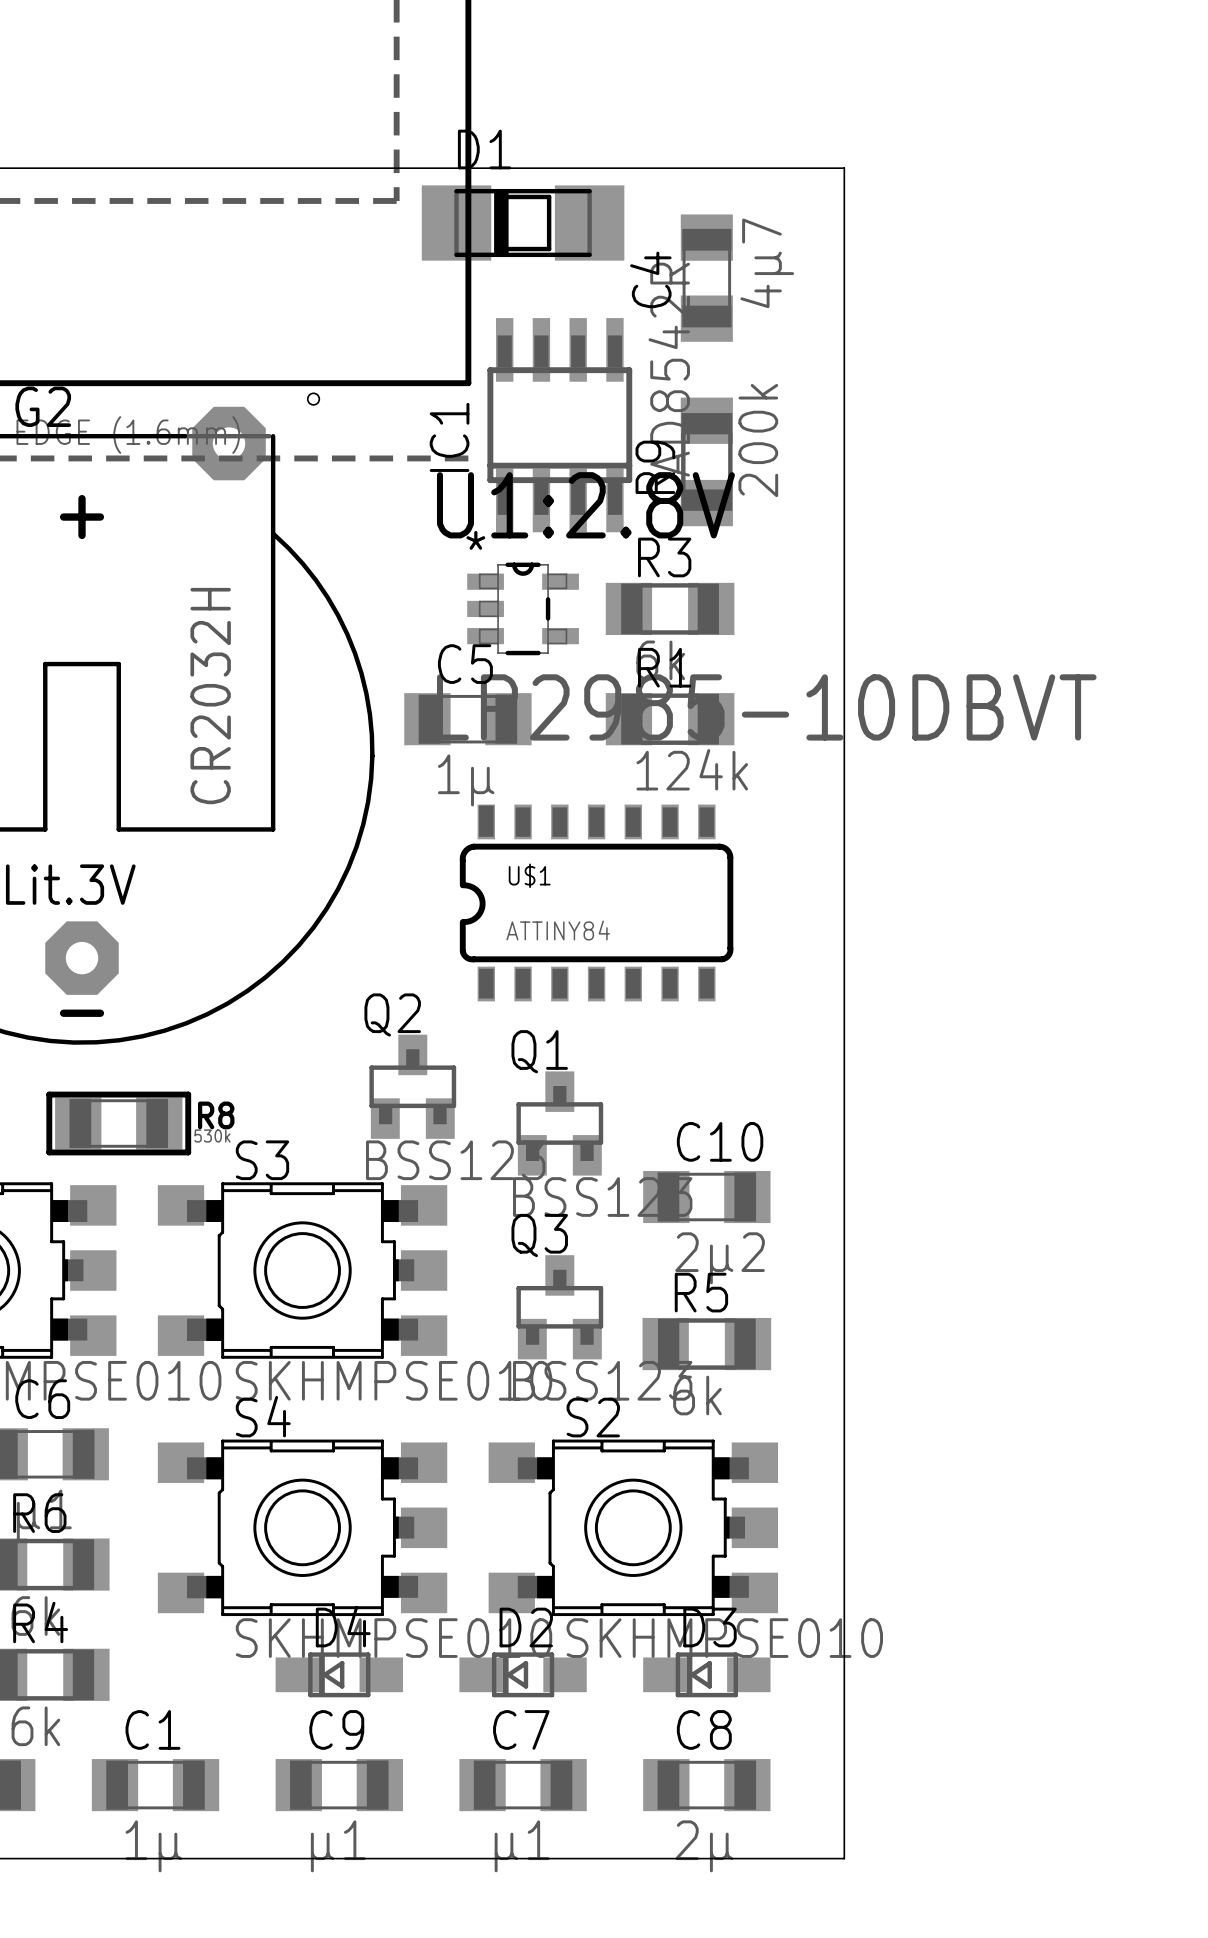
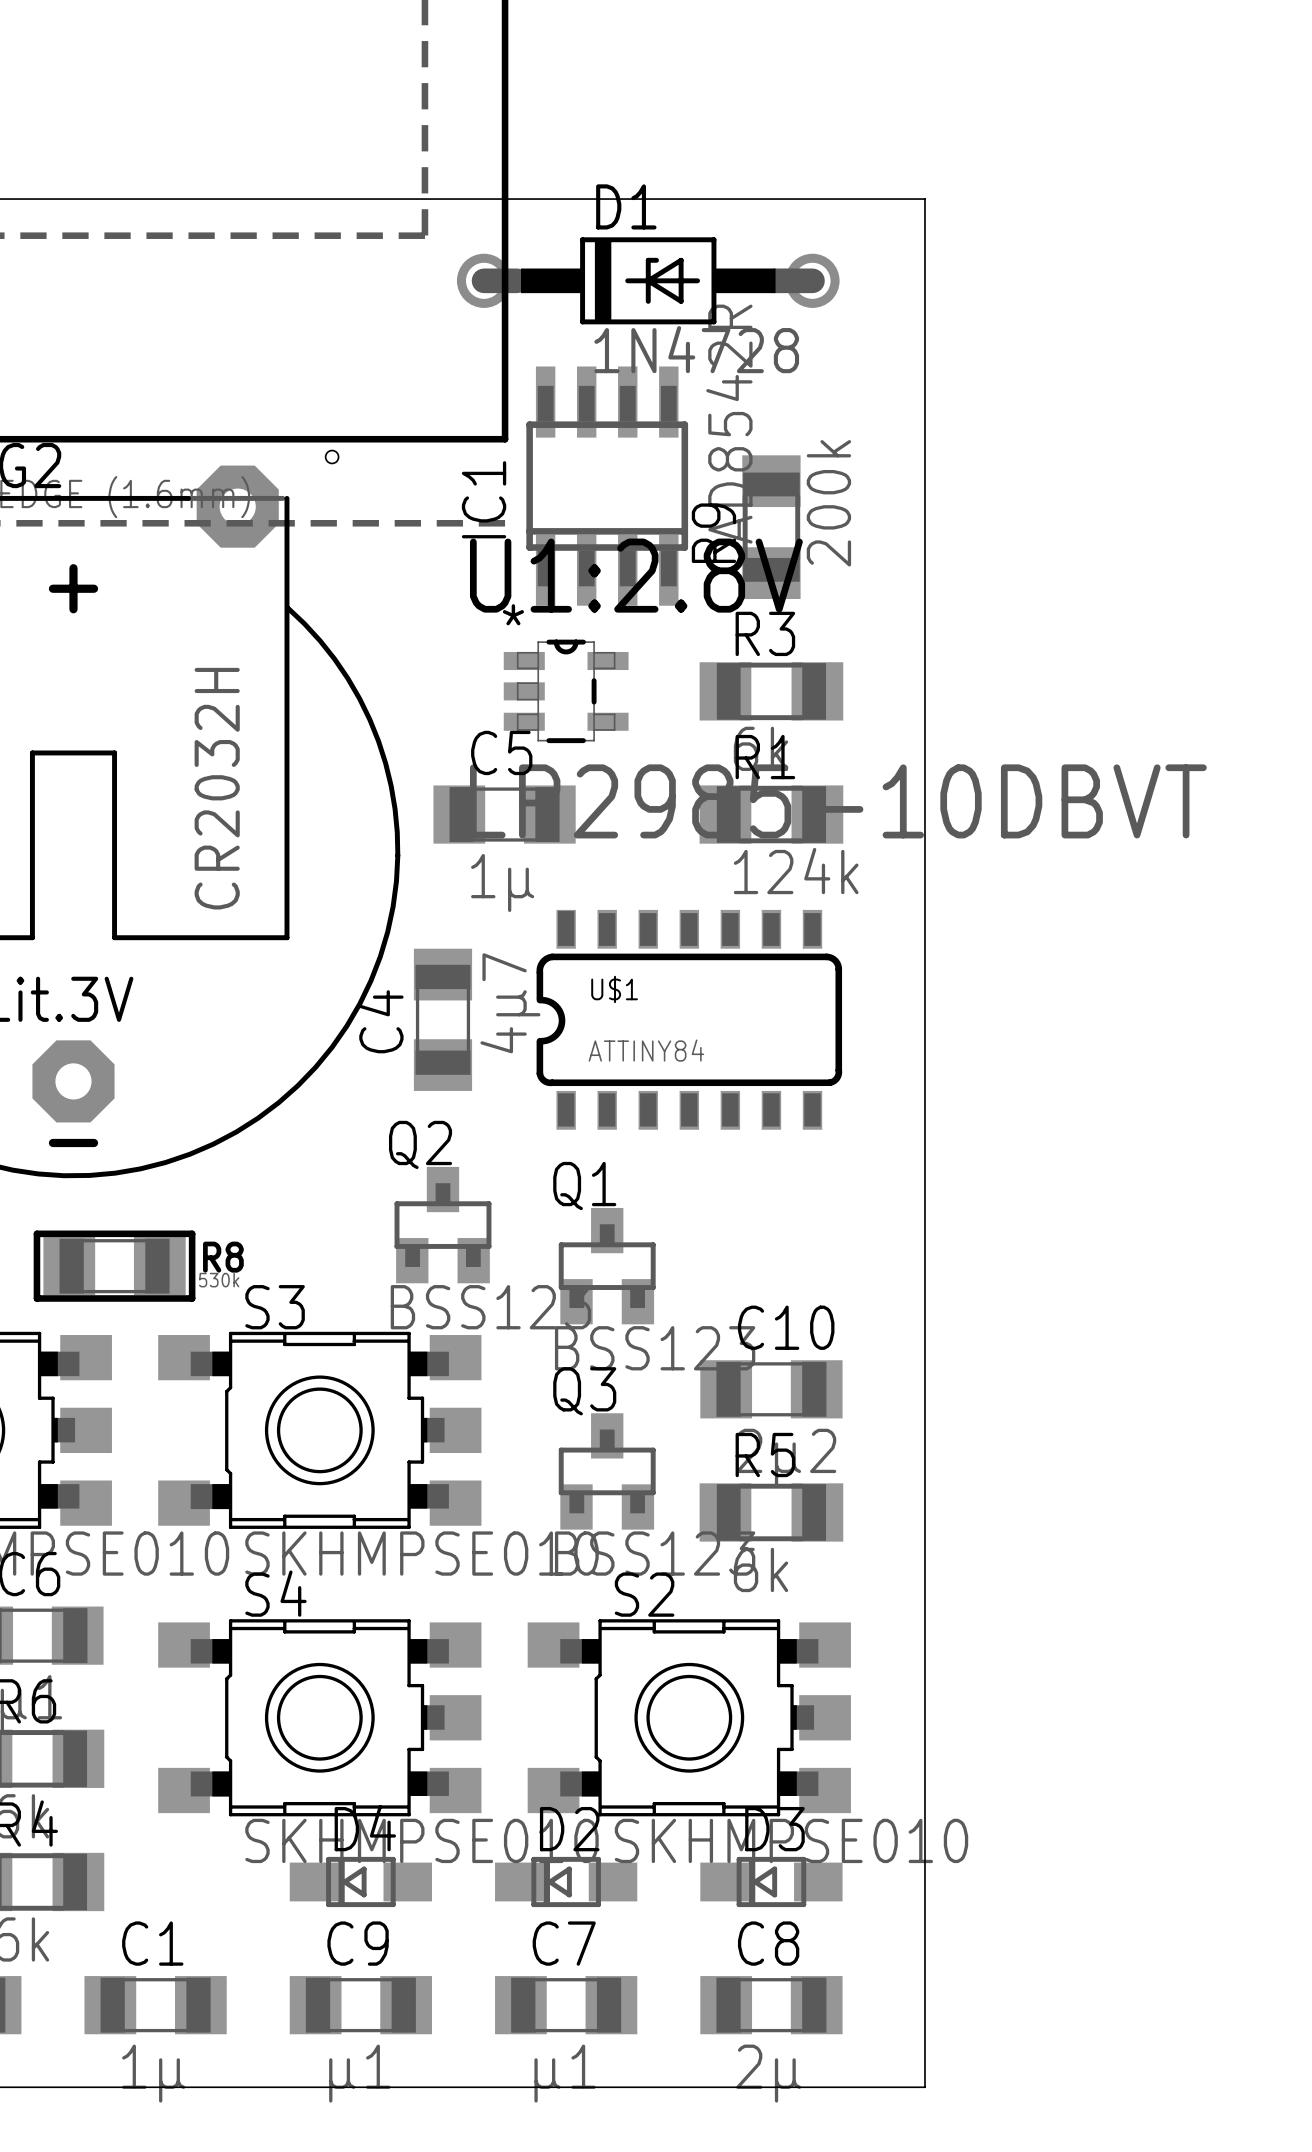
D1 footprint: [421, 185, 625, 261] -> [456, 237, 840, 325]
C4 position: (706, 278) -> (442, 1019)
D1 value: none -> 1N4728 (696, 349)
R3 position: (670, 608) -> (771, 691)
R1 position: (670, 719) -> (771, 814)
U$1 position: (596, 902) -> (689, 1019)
C10 position: (706, 1197) -> (771, 1389)

